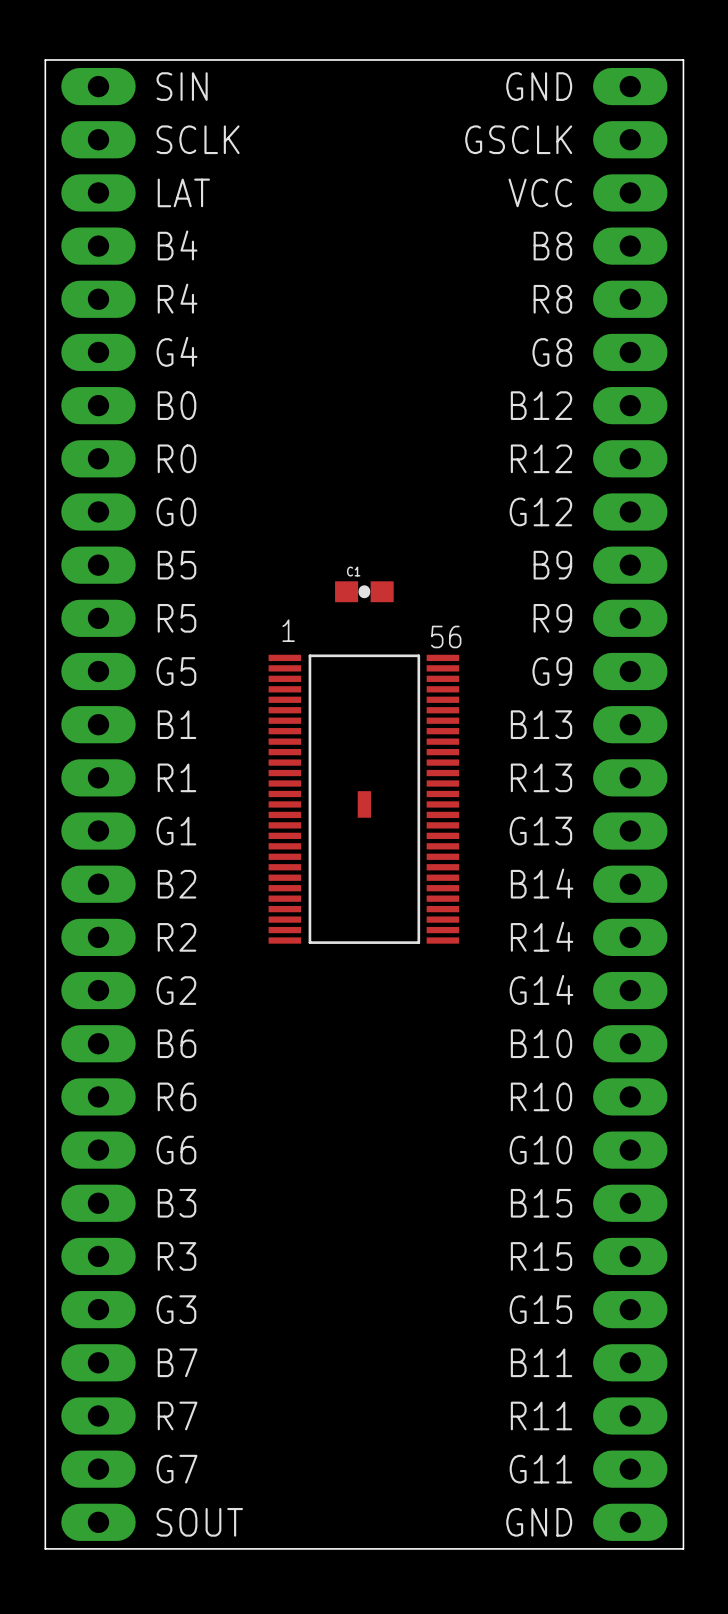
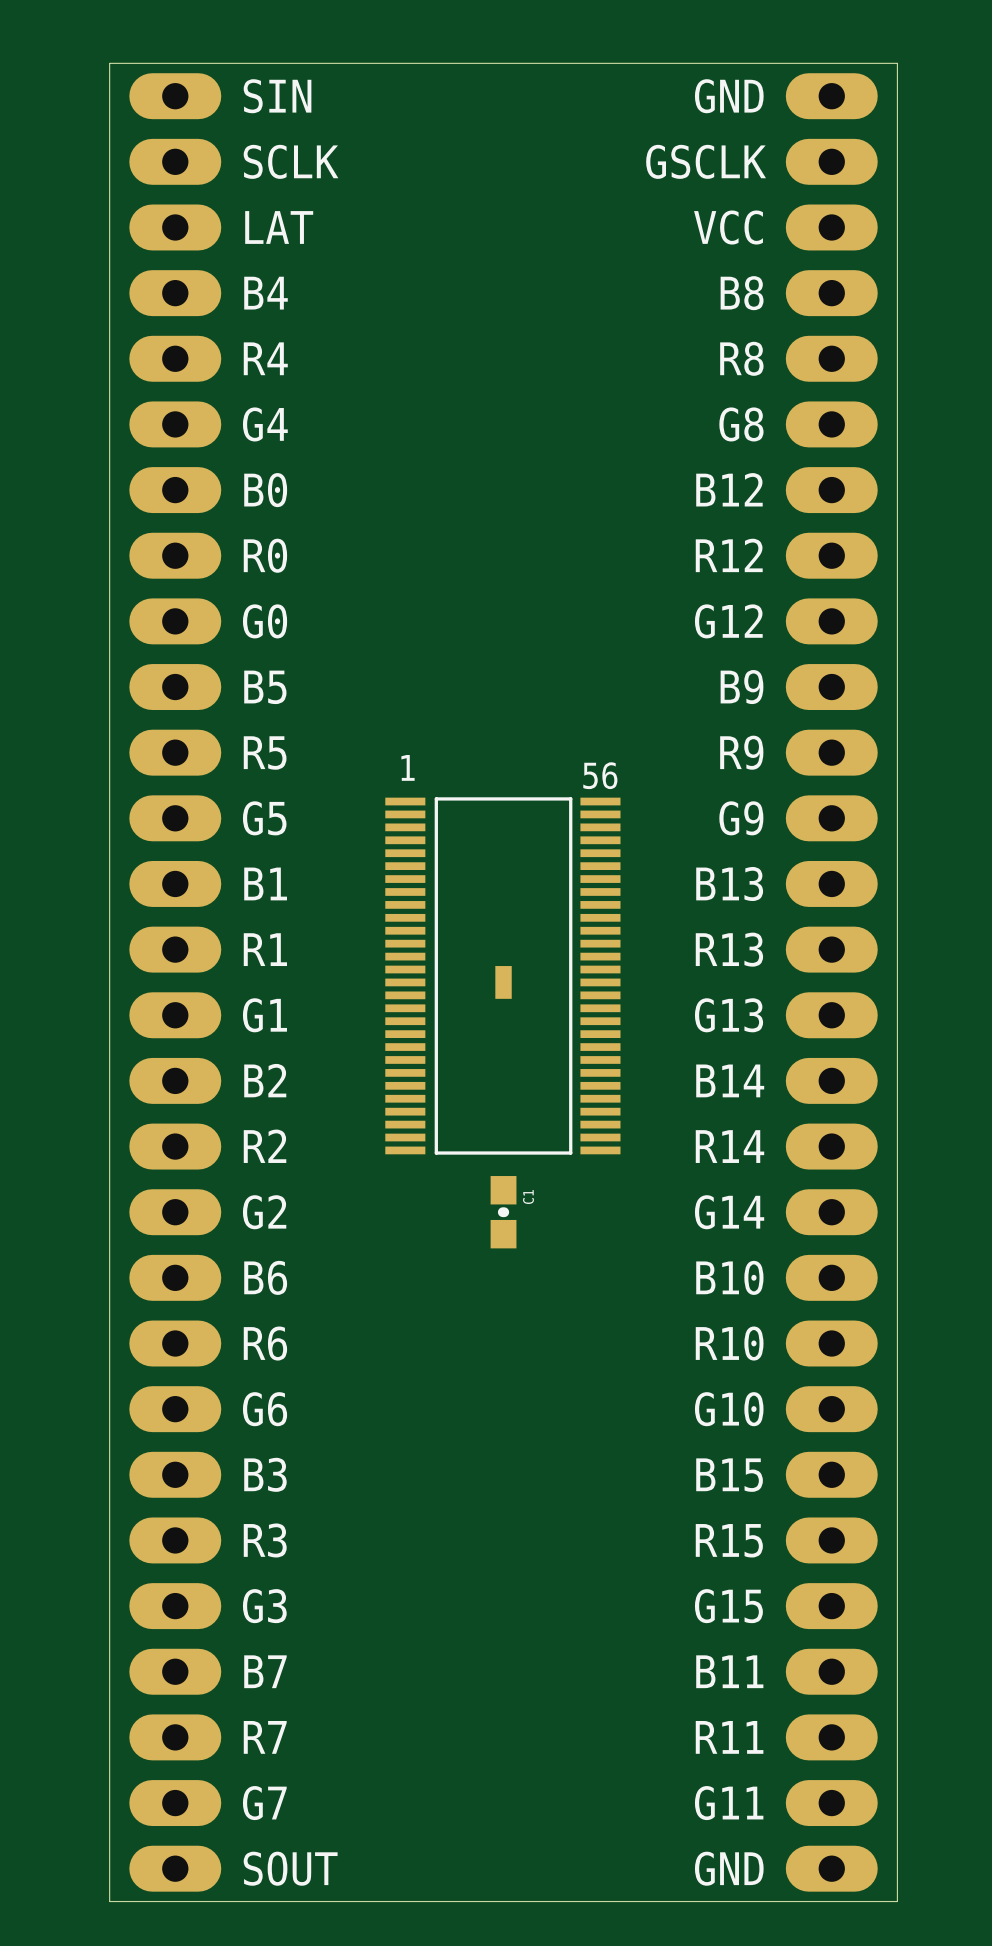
C1 footprint: [335, 581, 394, 603] -> [490, 1176, 517, 1249]

